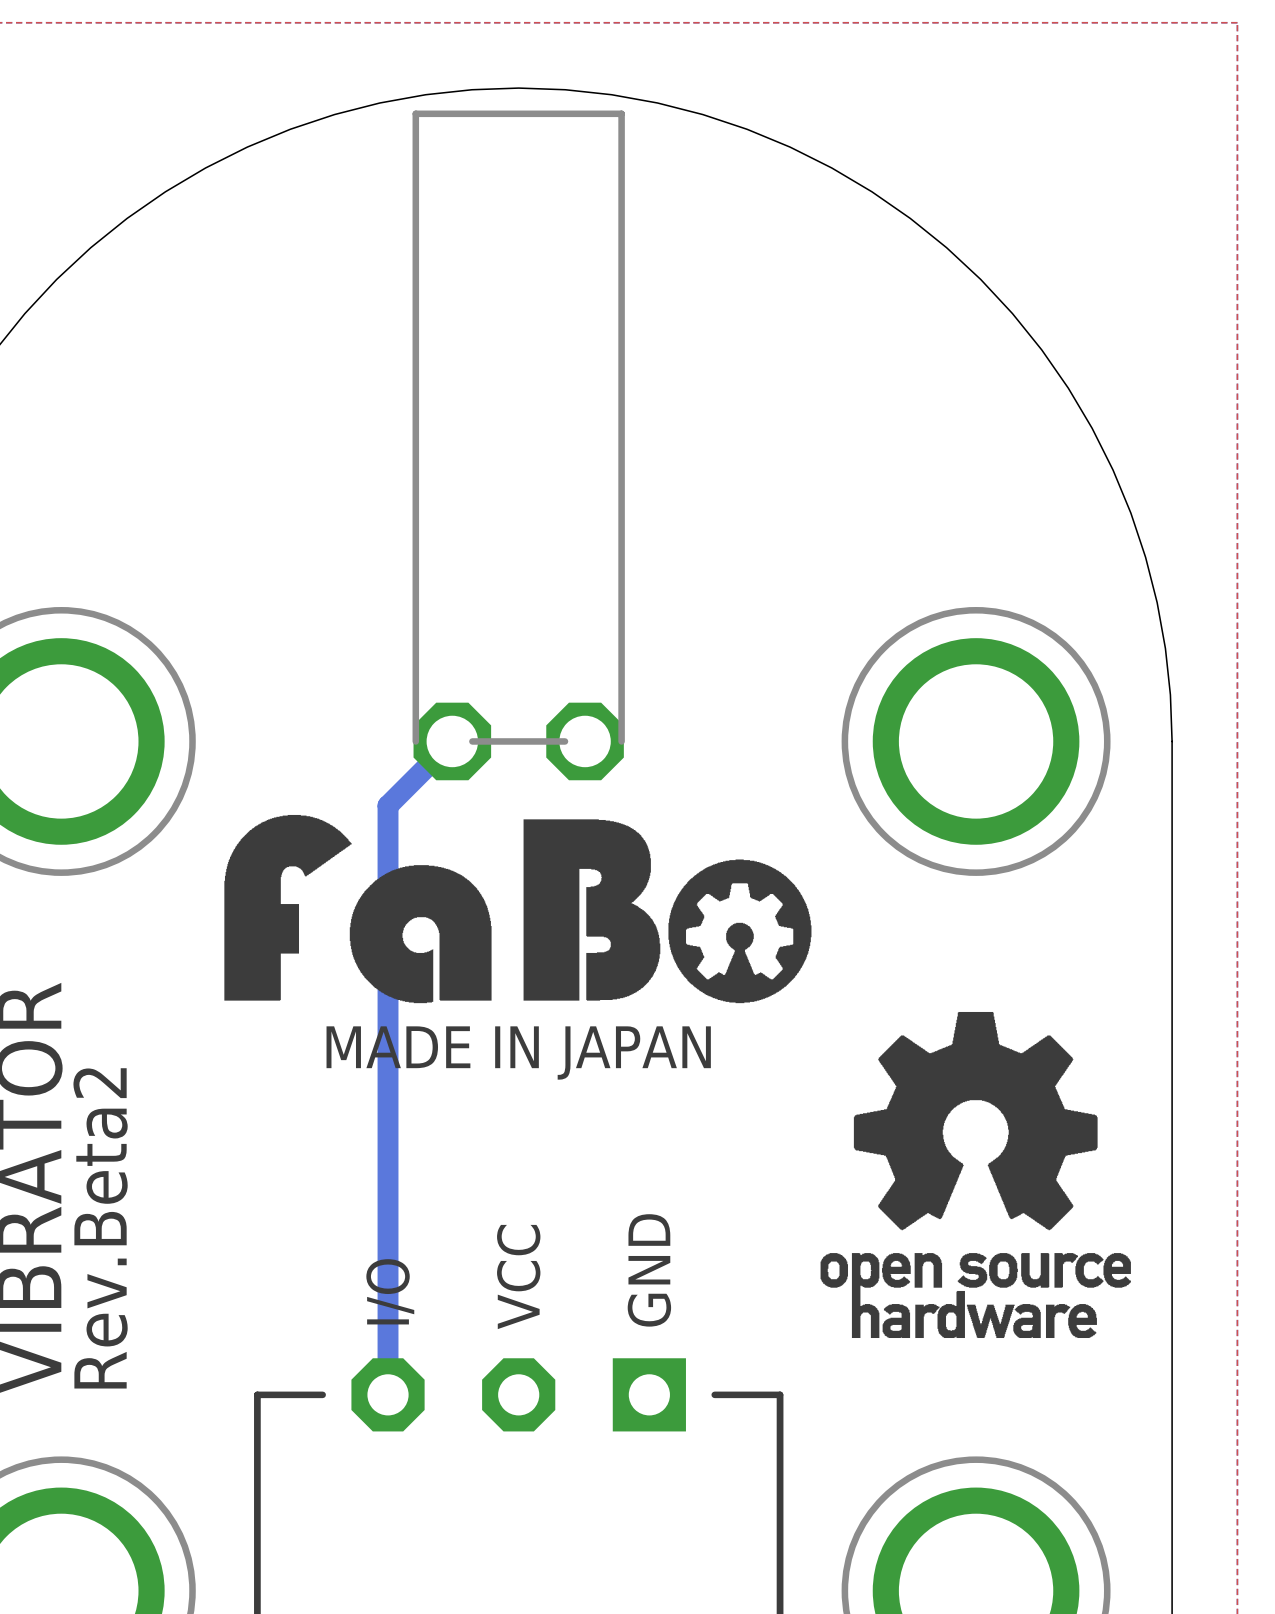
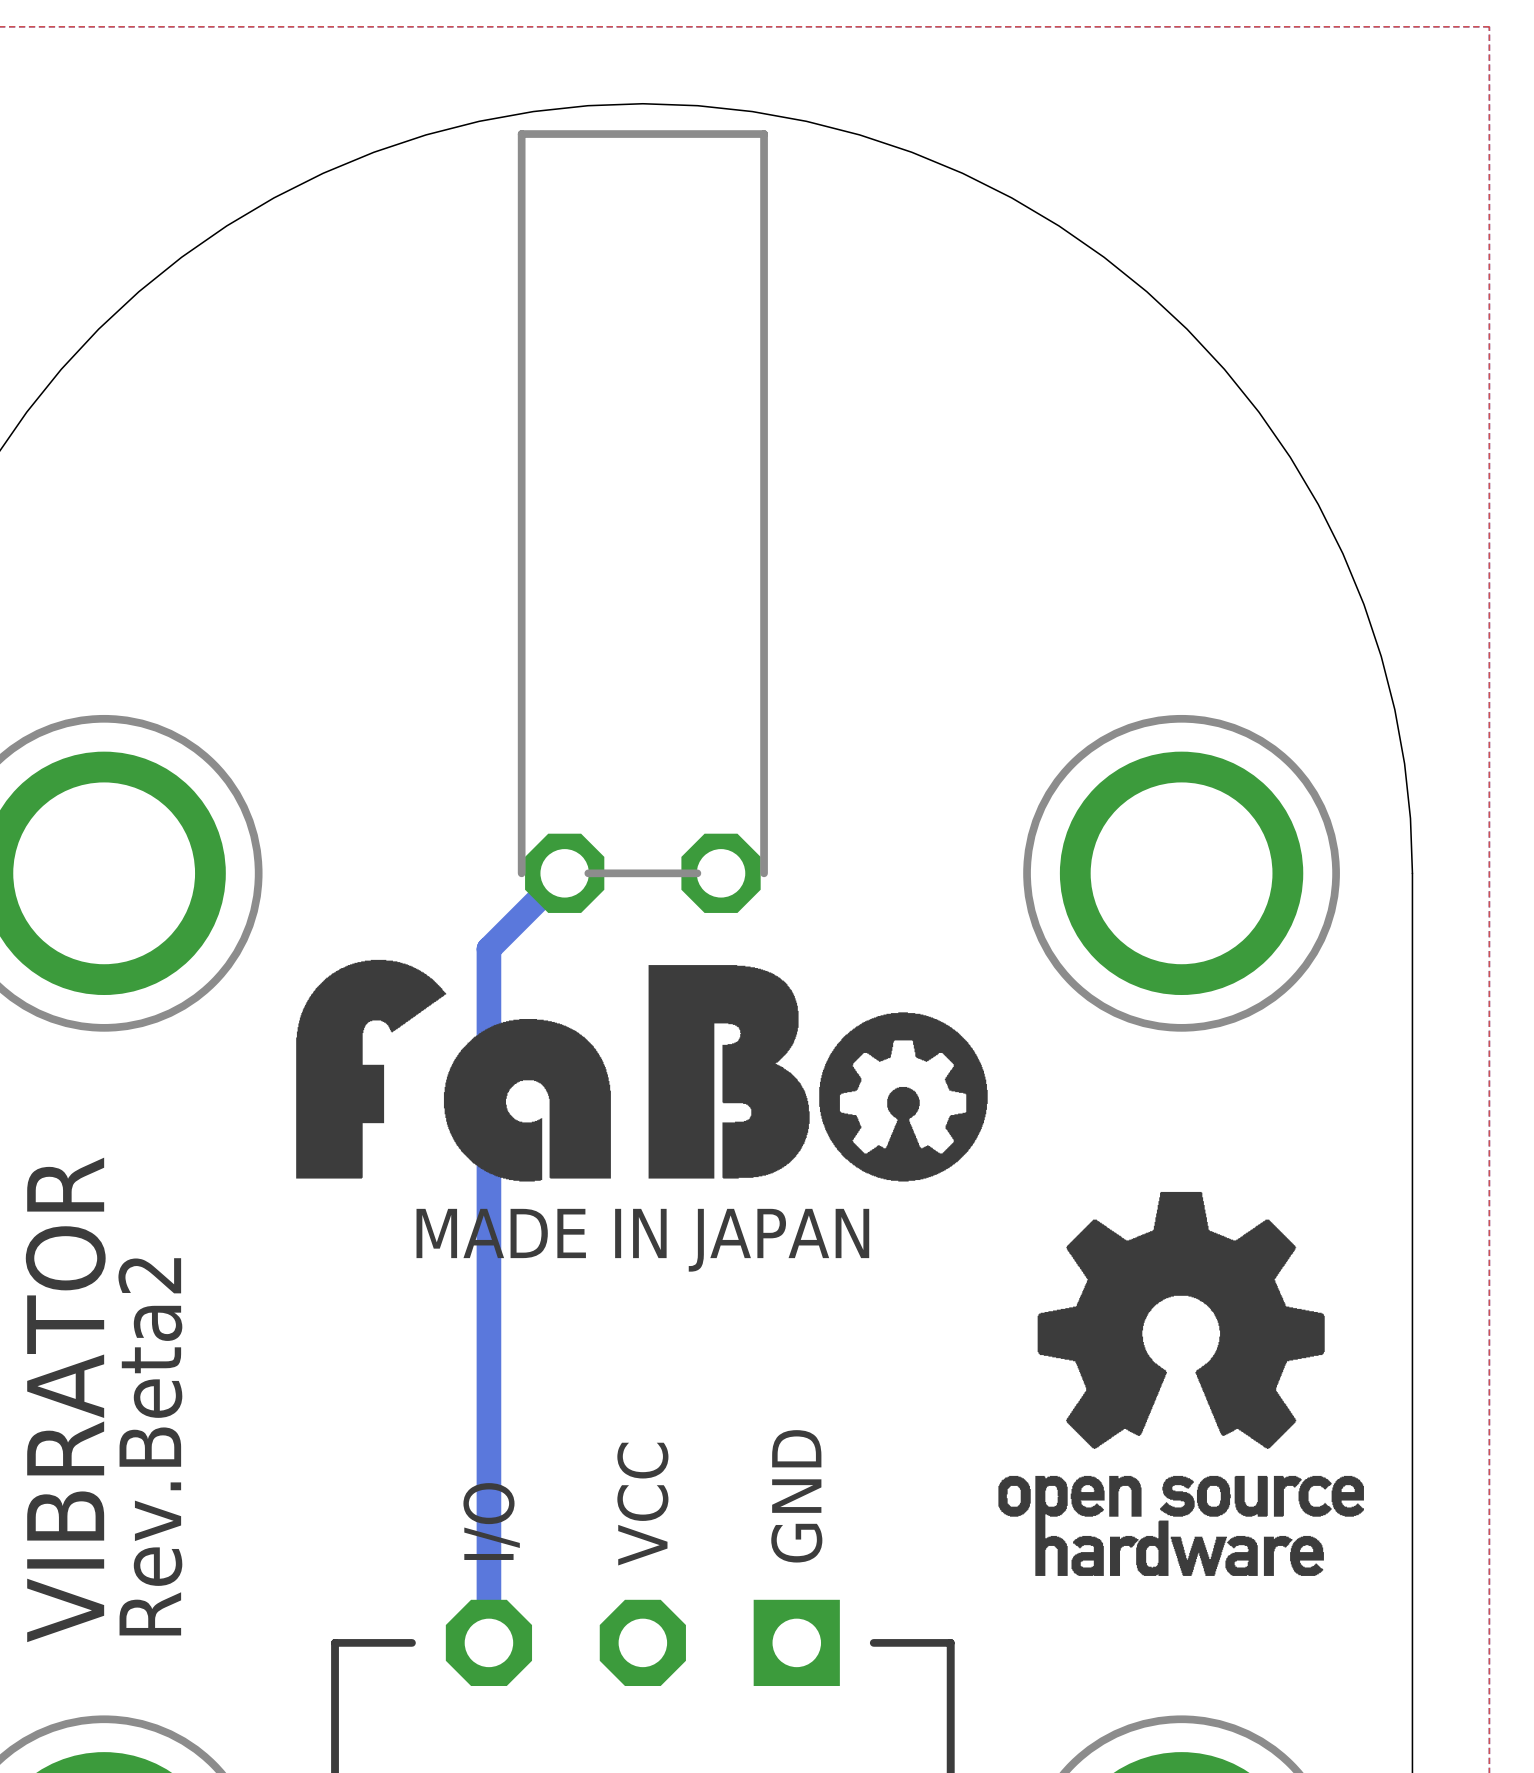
part footprint: [412, 110, 625, 781] -> [517, 130, 768, 913]

